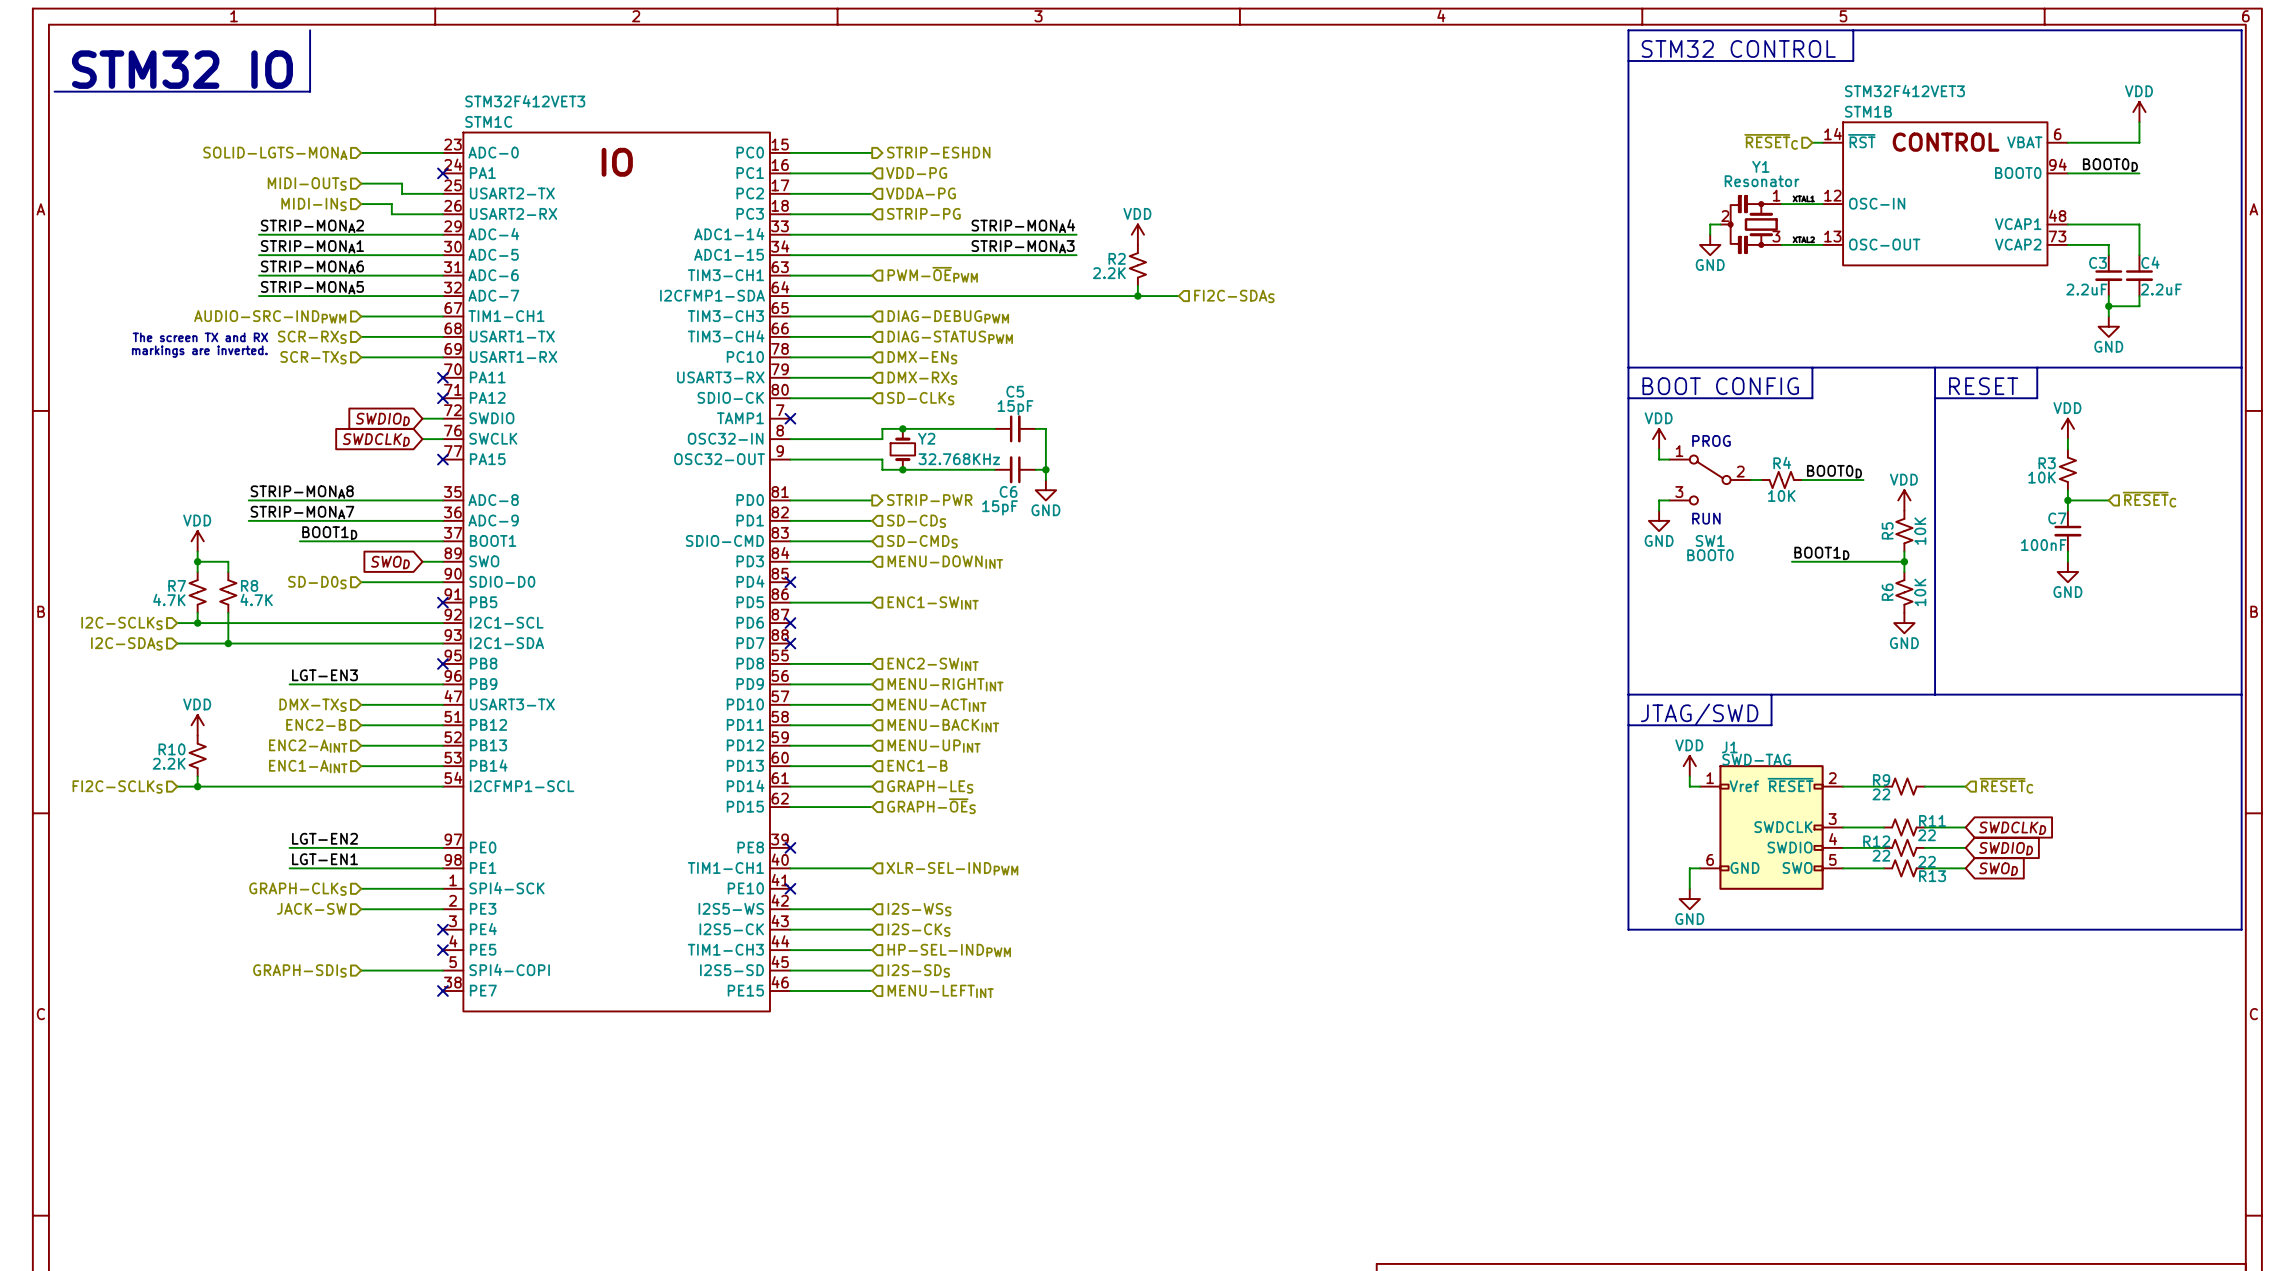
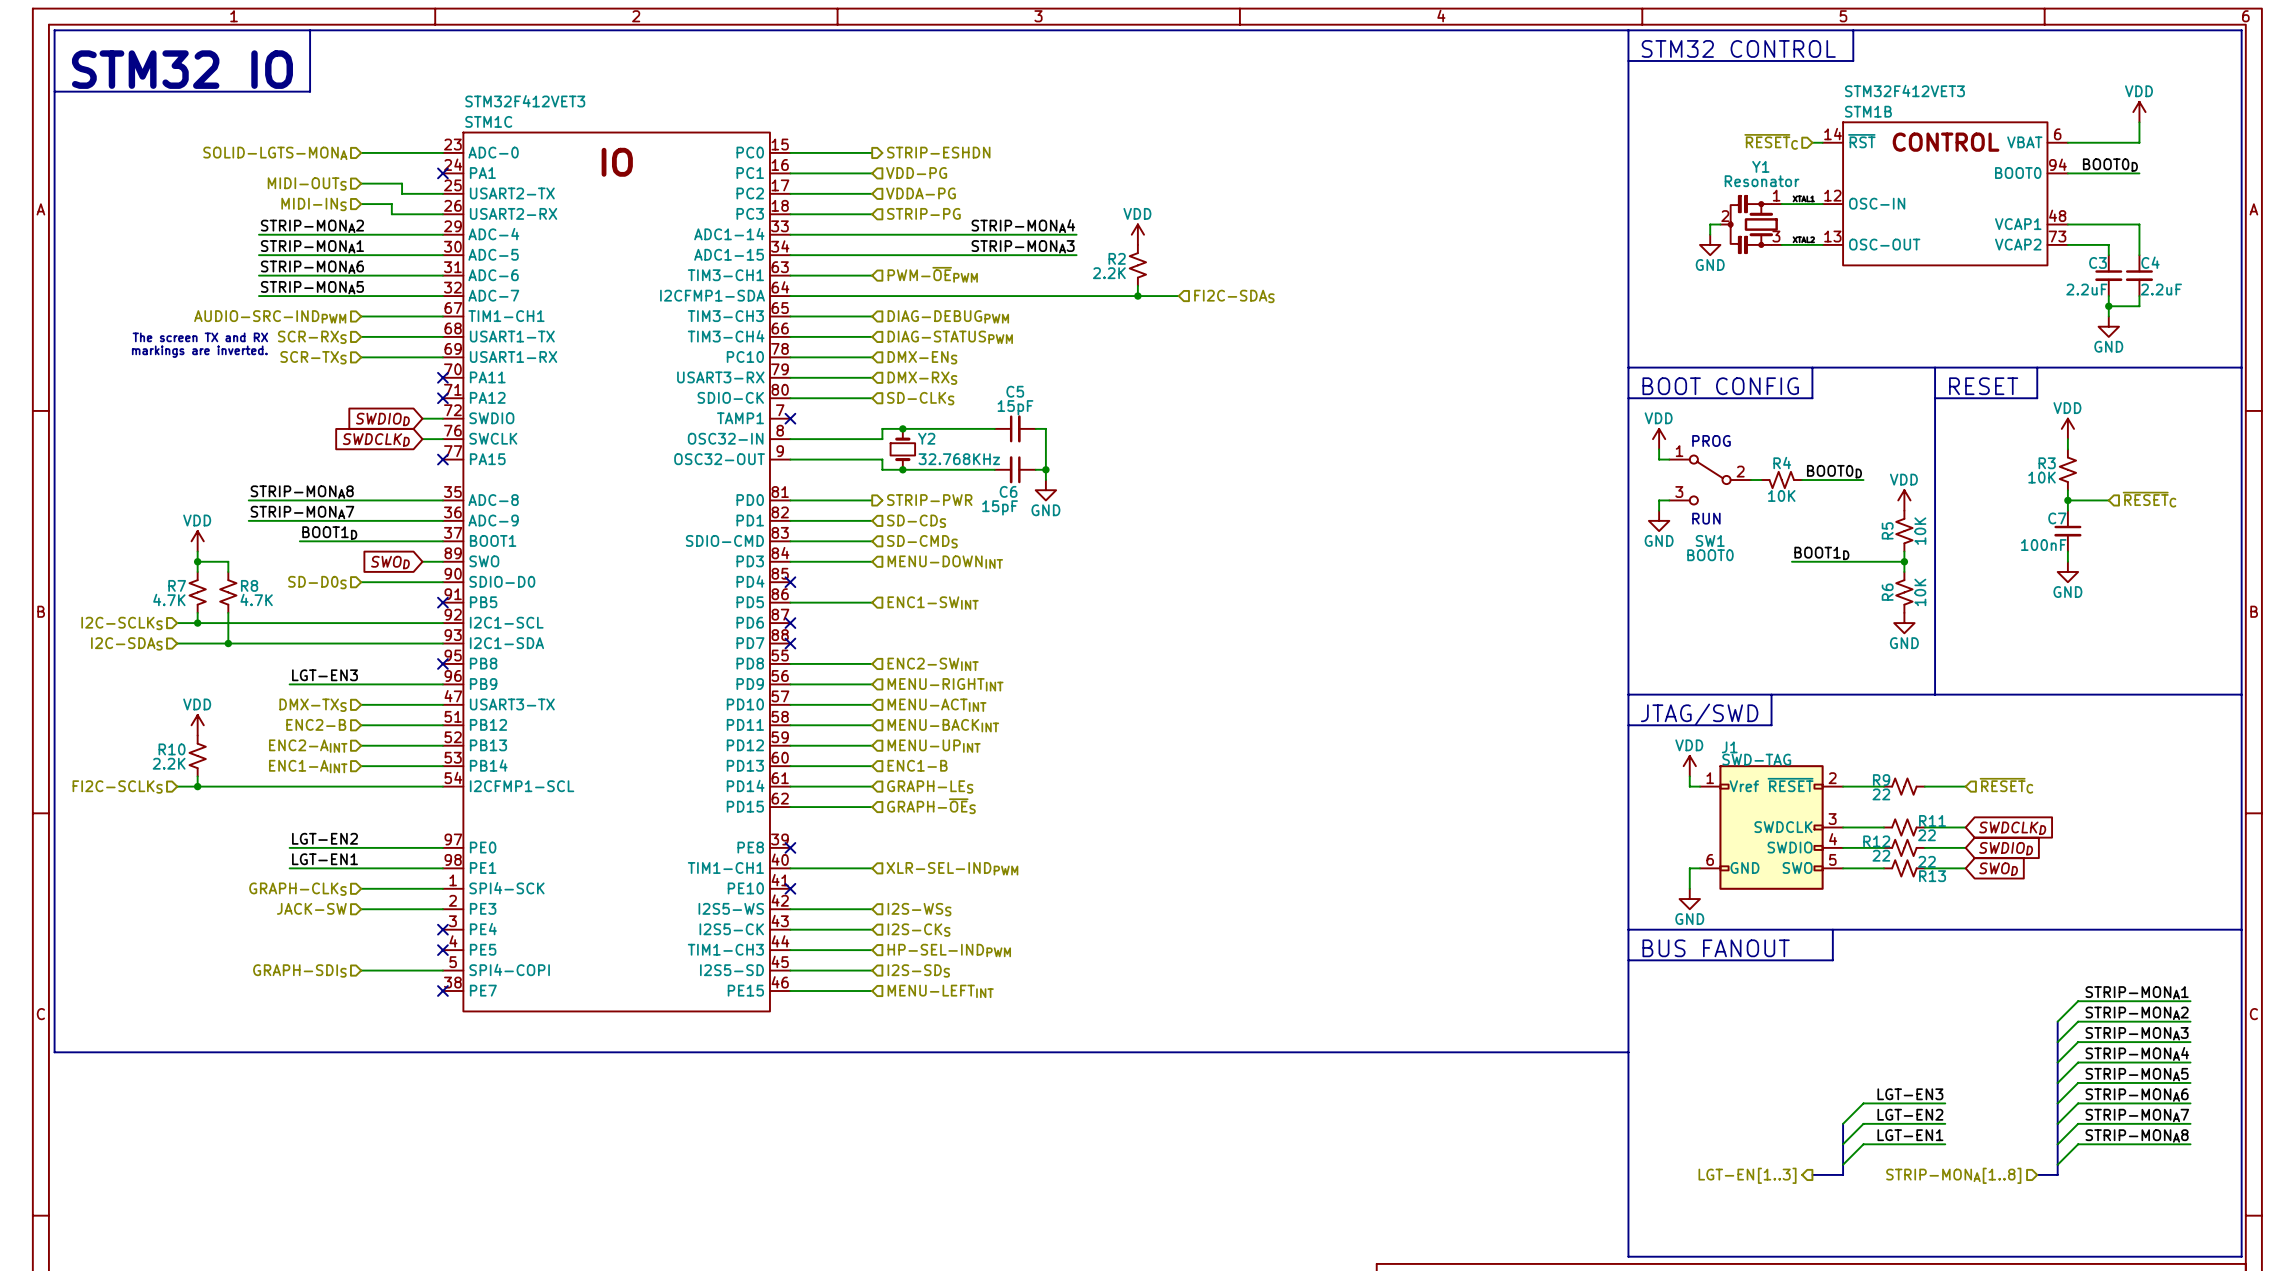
line: none -> (1628, 30) (54, 30) (54, 1052) (1628, 1052)
line: none -> (1628, 929) (1628, 1256) (2241, 1256) (2241, 929)
line: none -> (1832, 929) (1832, 960) (1628, 960)
text: none -> BUS FANOUT (1716, 948)
label: none -> STRIP-MONA1 (2137, 992)
wire: none -> (2190, 1001) (2078, 1001) (2057, 1021)
label: none -> STRIP-MONA2 (2137, 1013)
bus: none -> (2057, 1021) (2057, 1174) (2037, 1174)
wire: none -> (2190, 1021) (2078, 1021) (2057, 1042)
label: none -> STRIP-MONA3 (2137, 1033)
wire: none -> (2190, 1042) (2078, 1042) (2057, 1062)
label: none -> STRIP-MONA4 (2137, 1053)
wire: none -> (2190, 1062) (2078, 1062) (2057, 1082)
label: none -> STRIP-MONA5 (2137, 1074)
wire: none -> (2190, 1082) (2078, 1082) (2057, 1103)
label: none -> LGT-EN3 (1910, 1094)
label: none -> STRIP-MONA6 (2137, 1095)
wire: none -> (1945, 1103) (1863, 1103) (1843, 1123)
wire: none -> (2190, 1103) (2078, 1103) (2057, 1123)
label: none -> LGT-EN2 (1910, 1114)
label: none -> STRIP-MONA7 (2137, 1115)
bus: none -> (1843, 1123) (1843, 1174) (1812, 1174)
wire: none -> (1945, 1123) (1863, 1123) (1843, 1144)
wire: none -> (2190, 1123) (2078, 1123) (2057, 1144)
label: none -> LGT-EN1 (1910, 1135)
label: none -> STRIP-MONA8 (2137, 1135)
wire: none -> (1945, 1144) (1863, 1144) (1843, 1164)
wire: none -> (2190, 1144) (2078, 1144) (2057, 1164)
hierarchical label: none -> LGT-EN[1..3] (1747, 1175)
hierarchical label: none -> STRIP-MONA[1..8] (1953, 1175)

